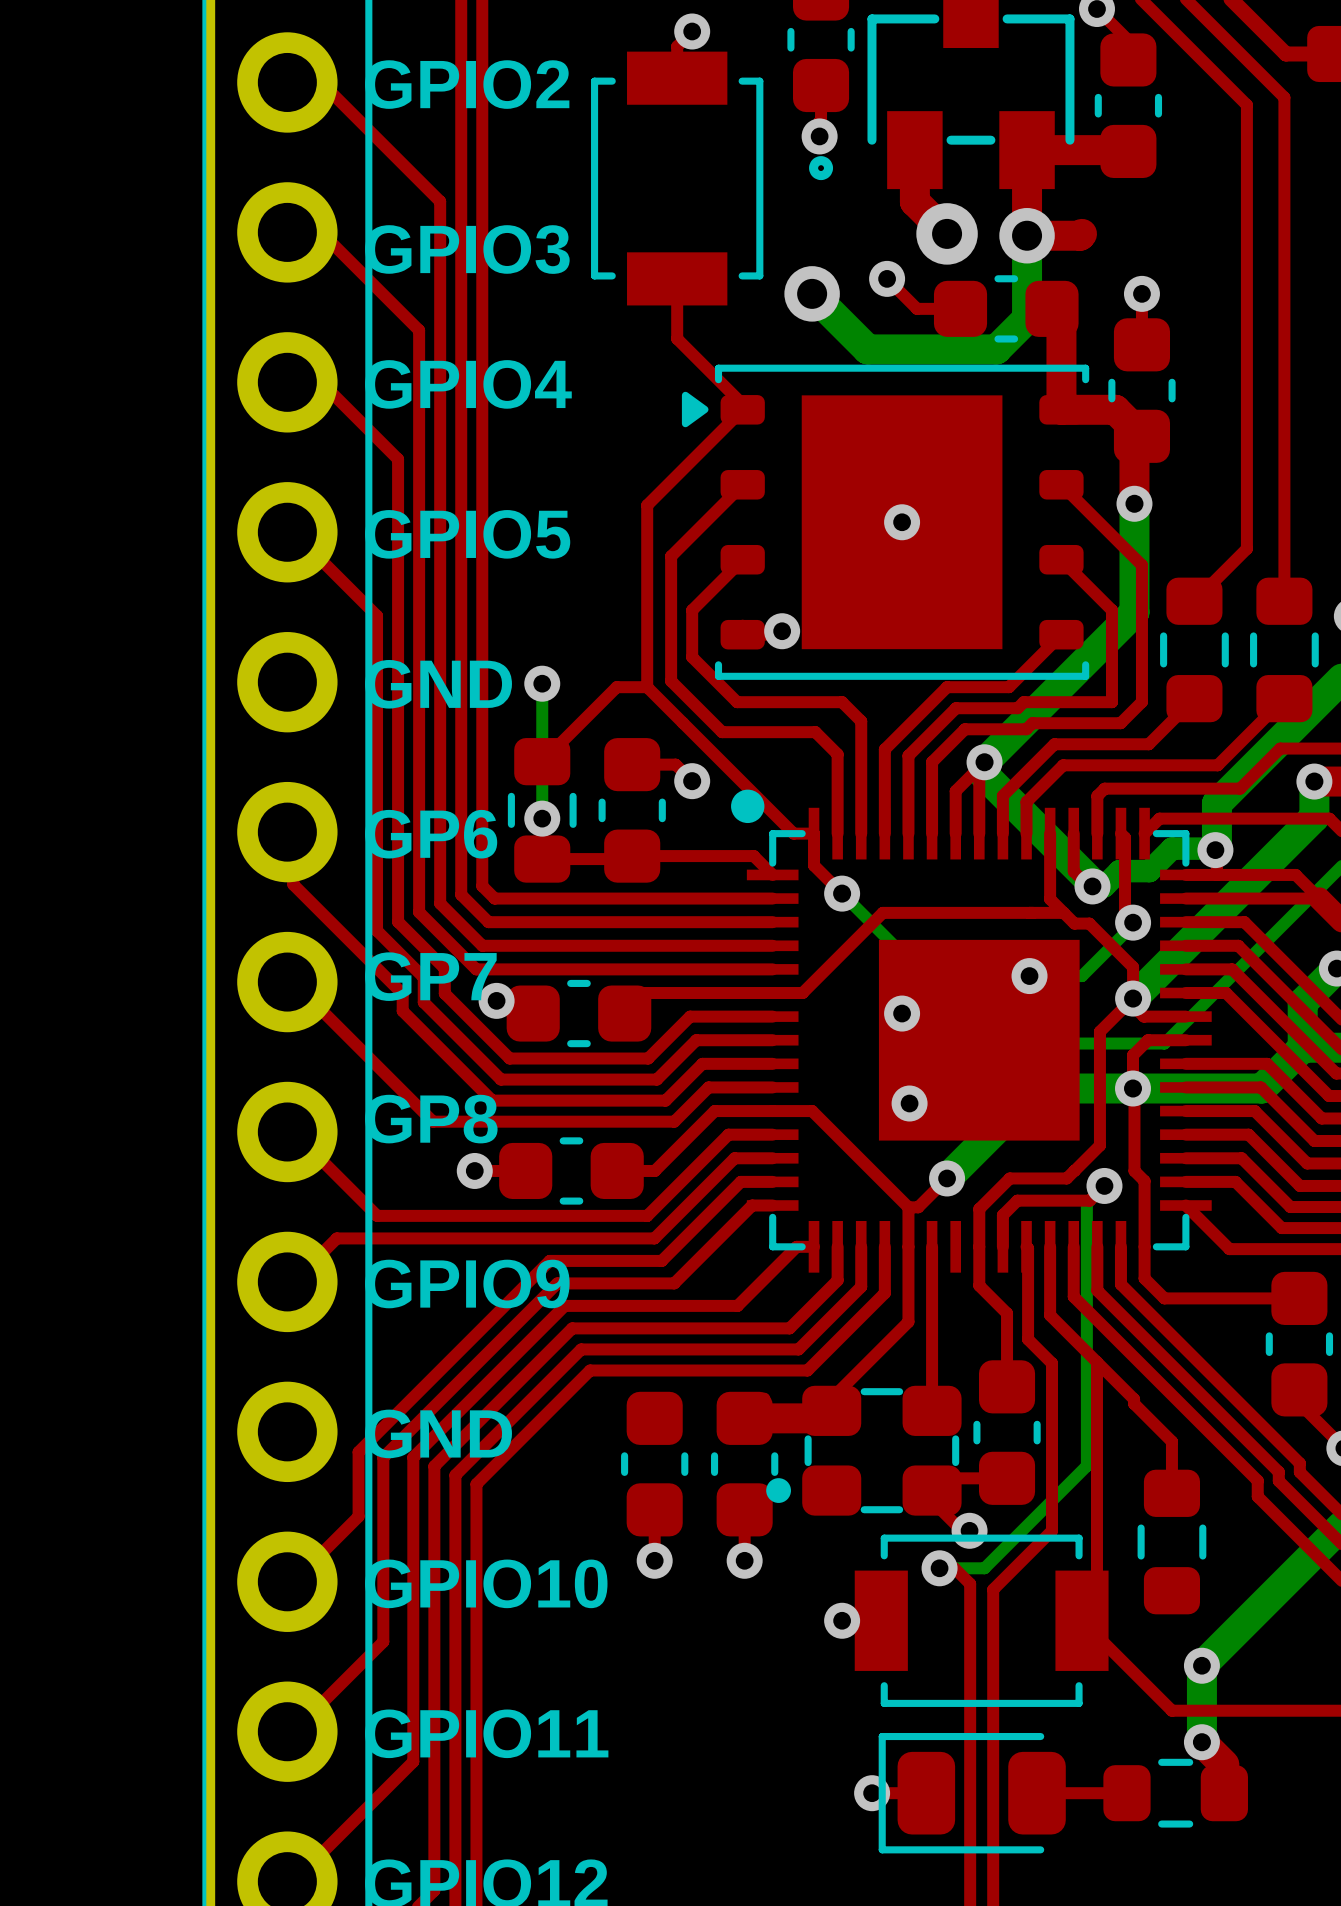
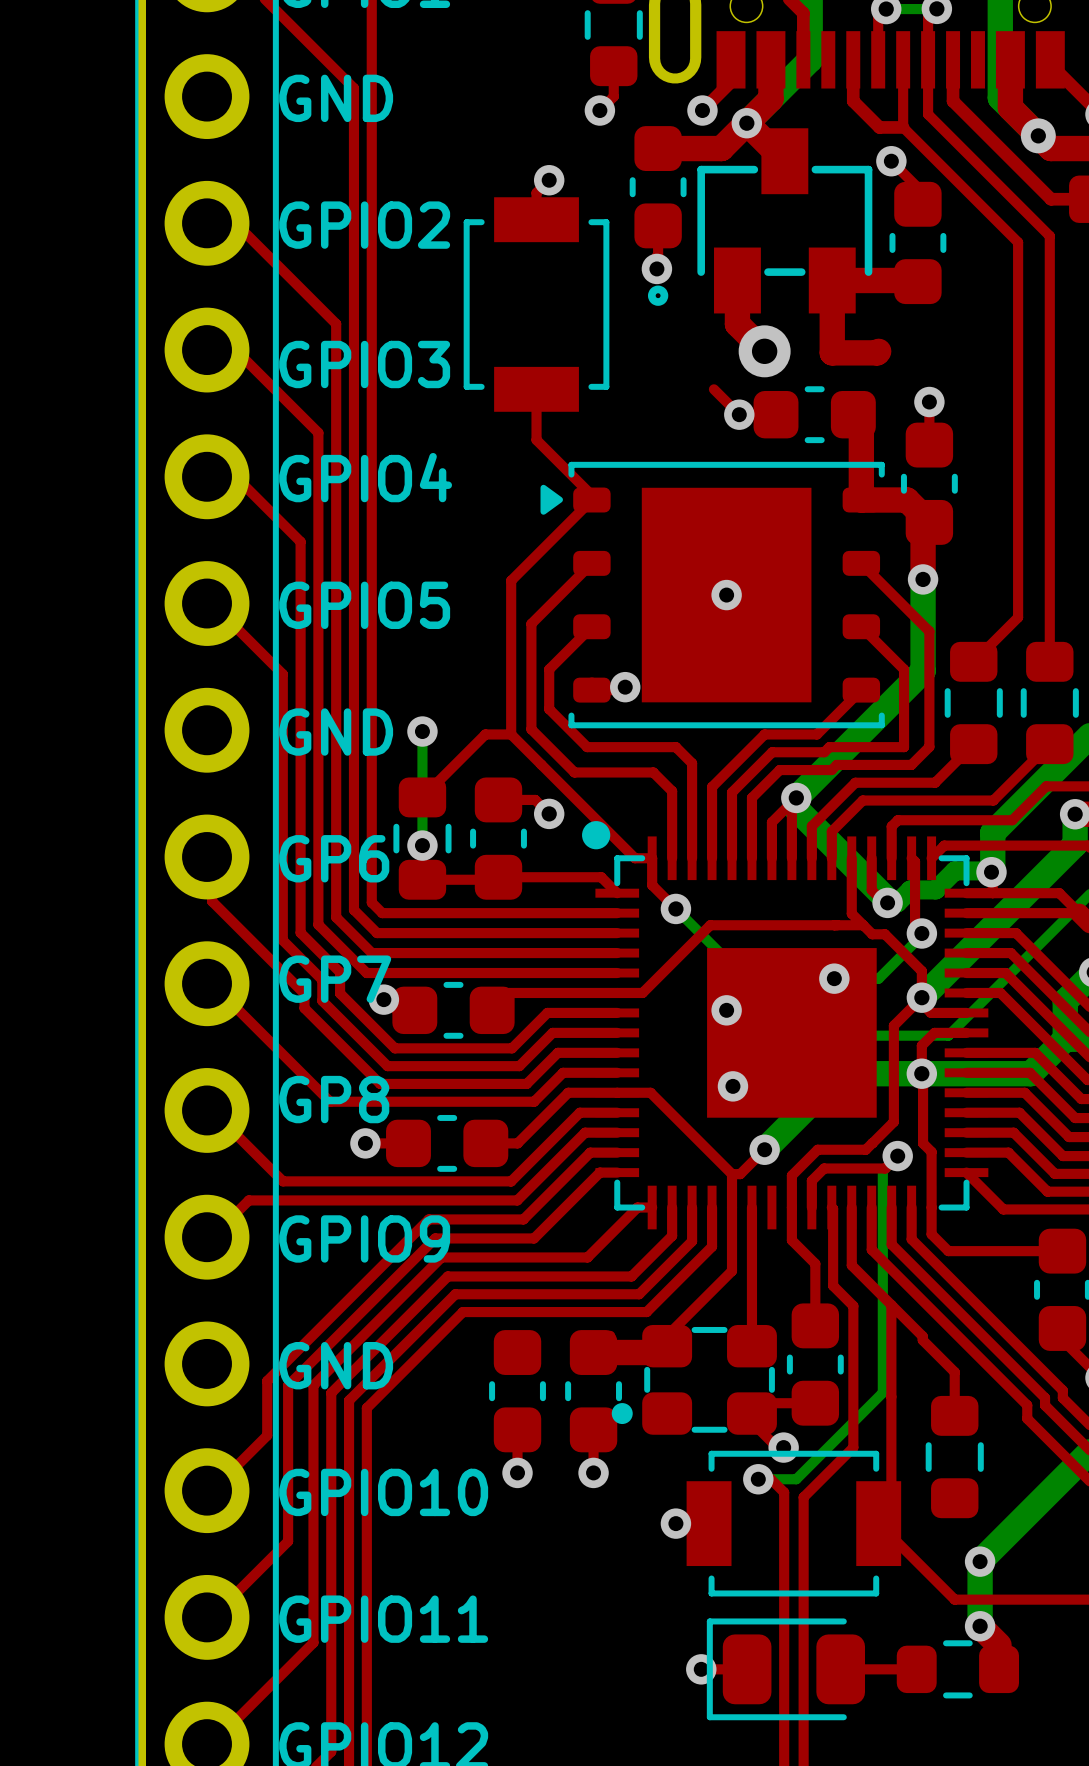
bottom track: (1027, 235) (1027, 318) (996, 349) (867, 349) (812, 293) -> none
via: (1027, 235) -> none
via position: (887, 278) -> (739, 414)
via: (812, 293) -> none

